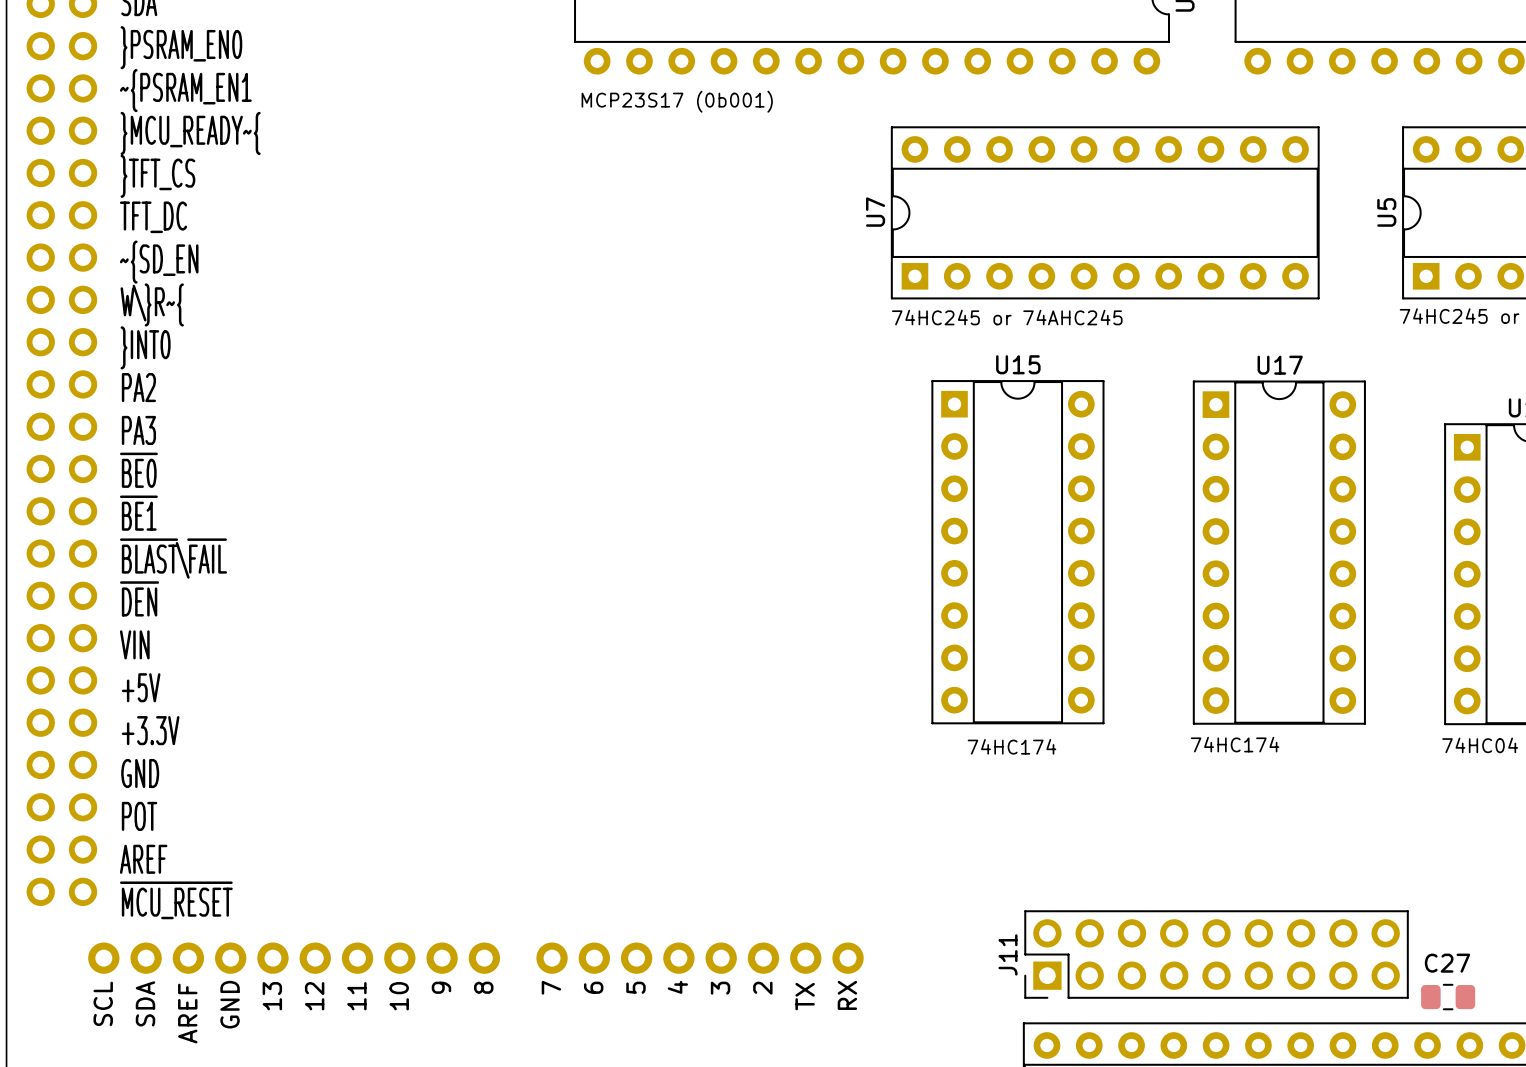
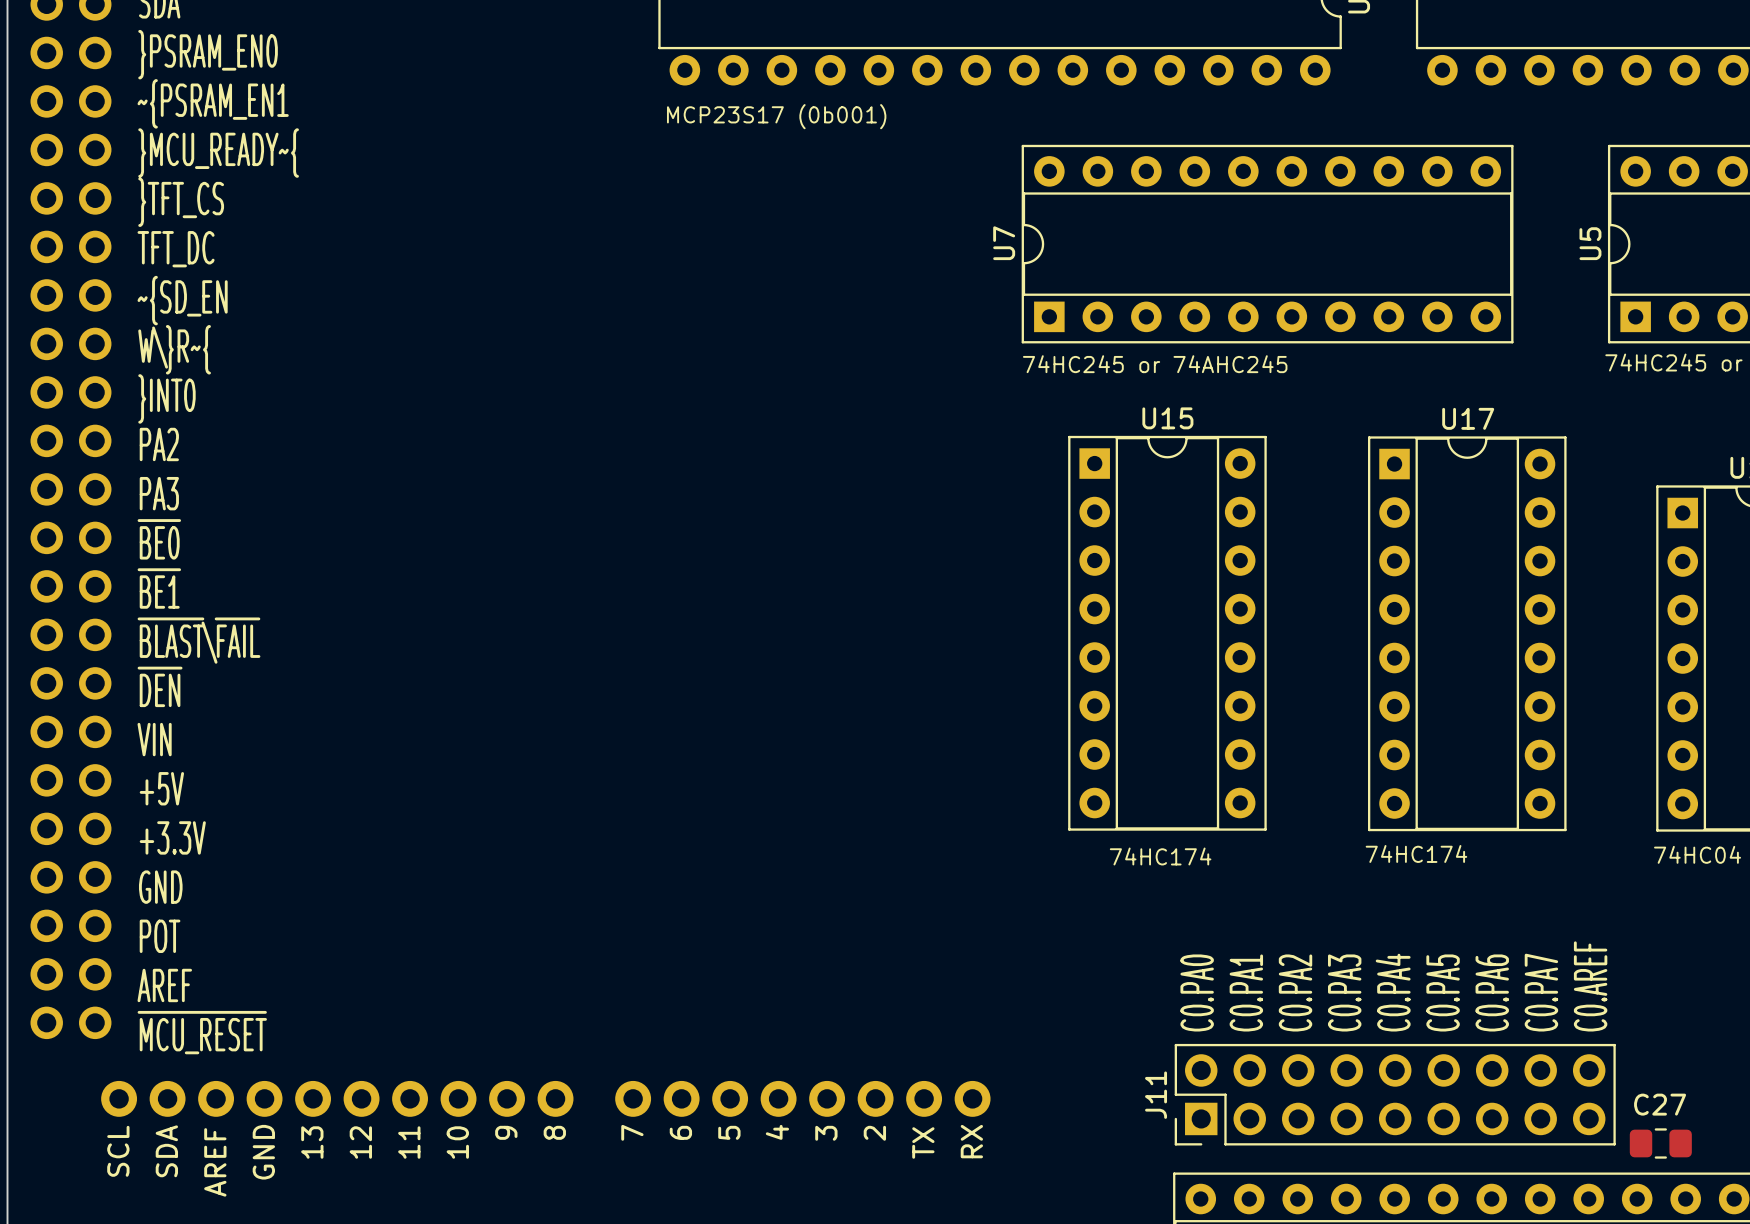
text: none -> C0.AREF (1590, 986)
text: none -> C0.PA0 (1197, 992)
text: none -> C0.PA1 (1246, 992)
text: none -> C0.PA2 (1295, 992)
text: none -> C0.PA3 (1344, 992)
text: none -> C0.PA4 (1393, 992)
text: none -> C0.PA5 (1443, 992)
text: none -> C0.PA6 (1492, 992)
text: none -> C0.PA7 (1541, 992)

